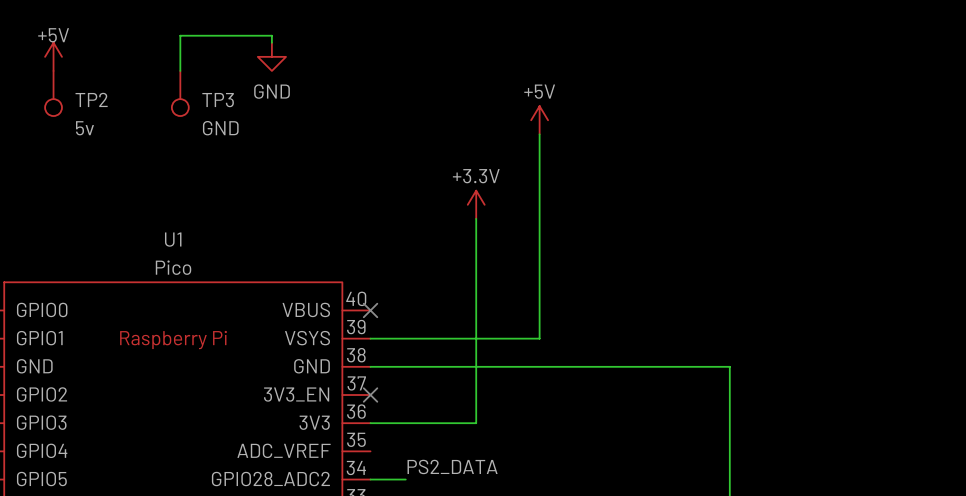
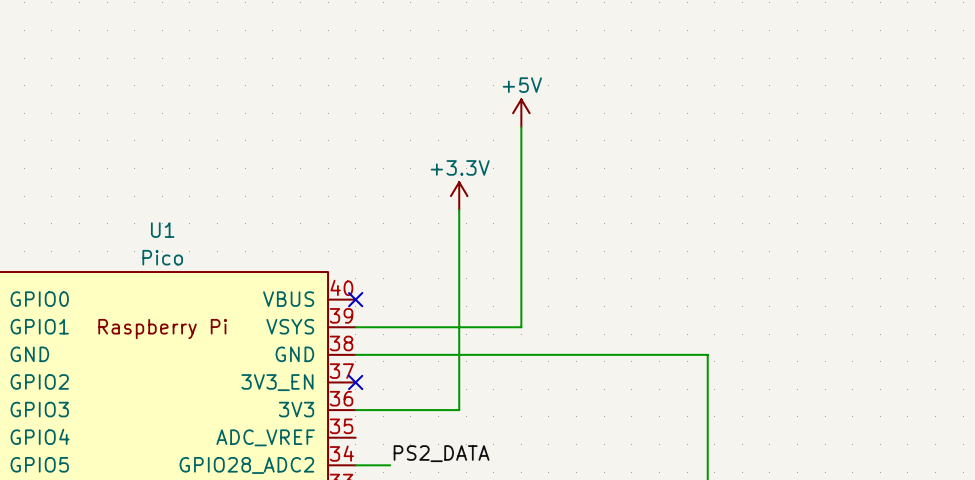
wire: (271, 42) (271, 35) (180, 35) (180, 70) -> none
power symbol: +5V (53, 56) -> none
power symbol: GND (271, 56) -> none
TP2: 5v (53, 93) -> none
TP3: GND (180, 93) -> none

